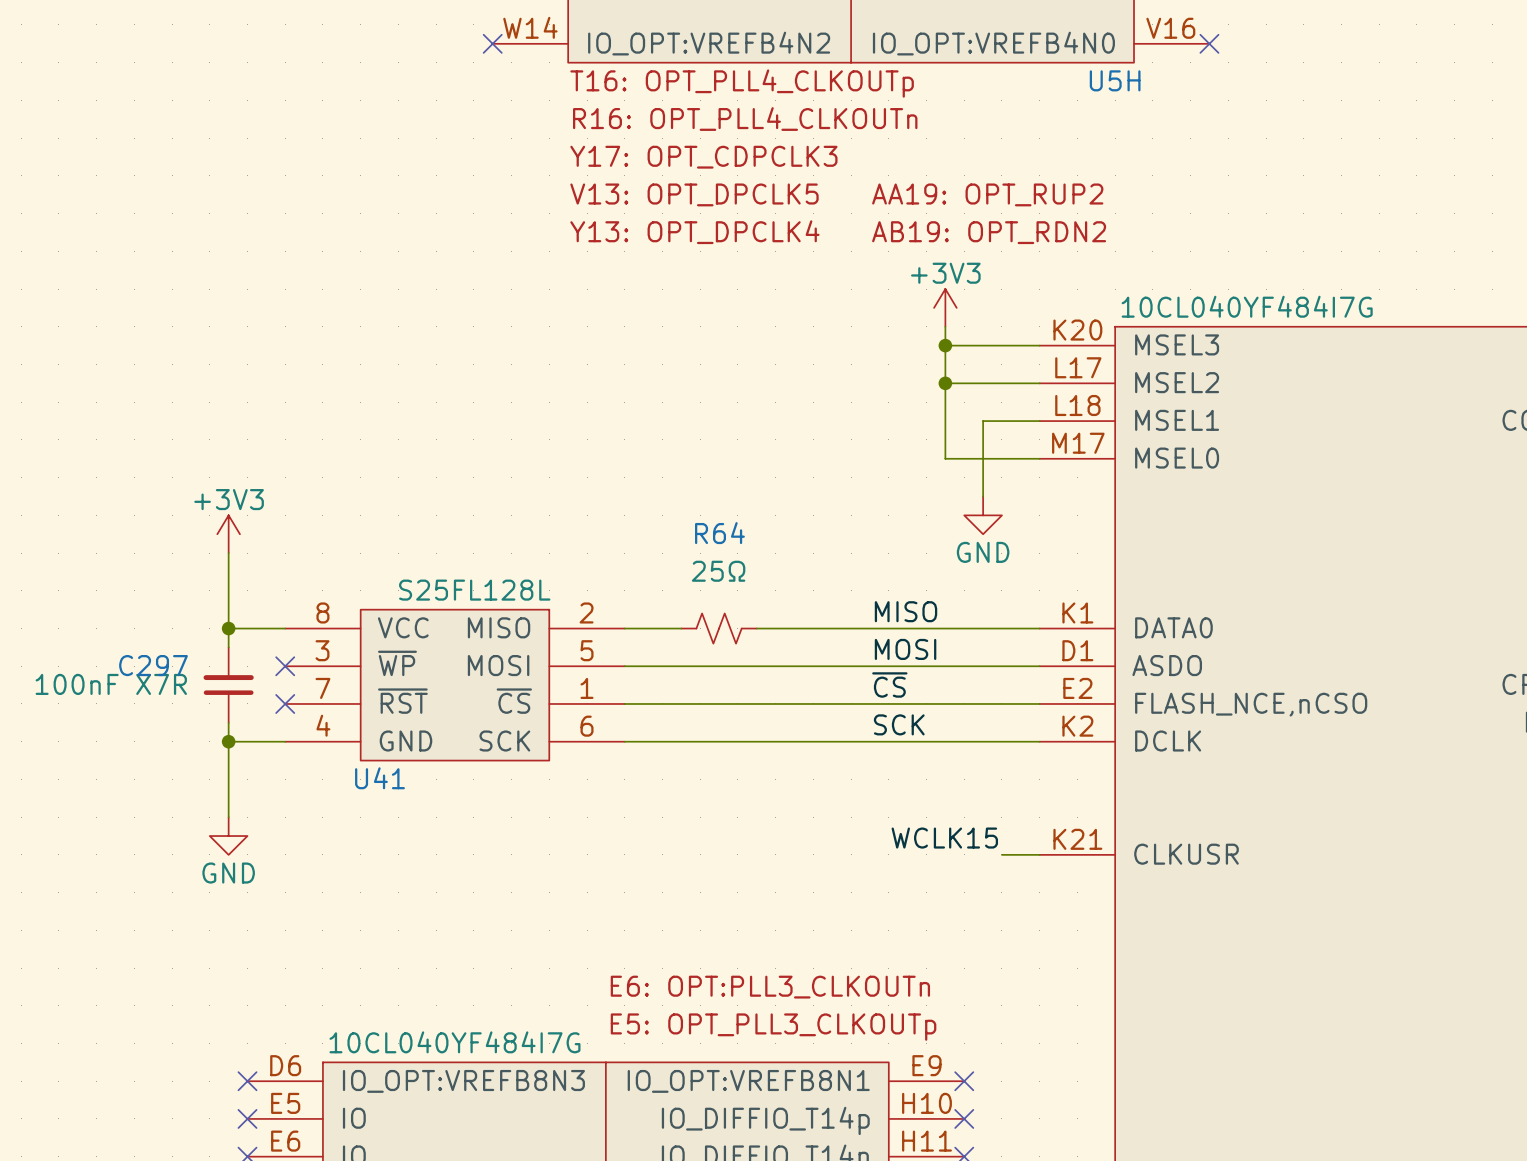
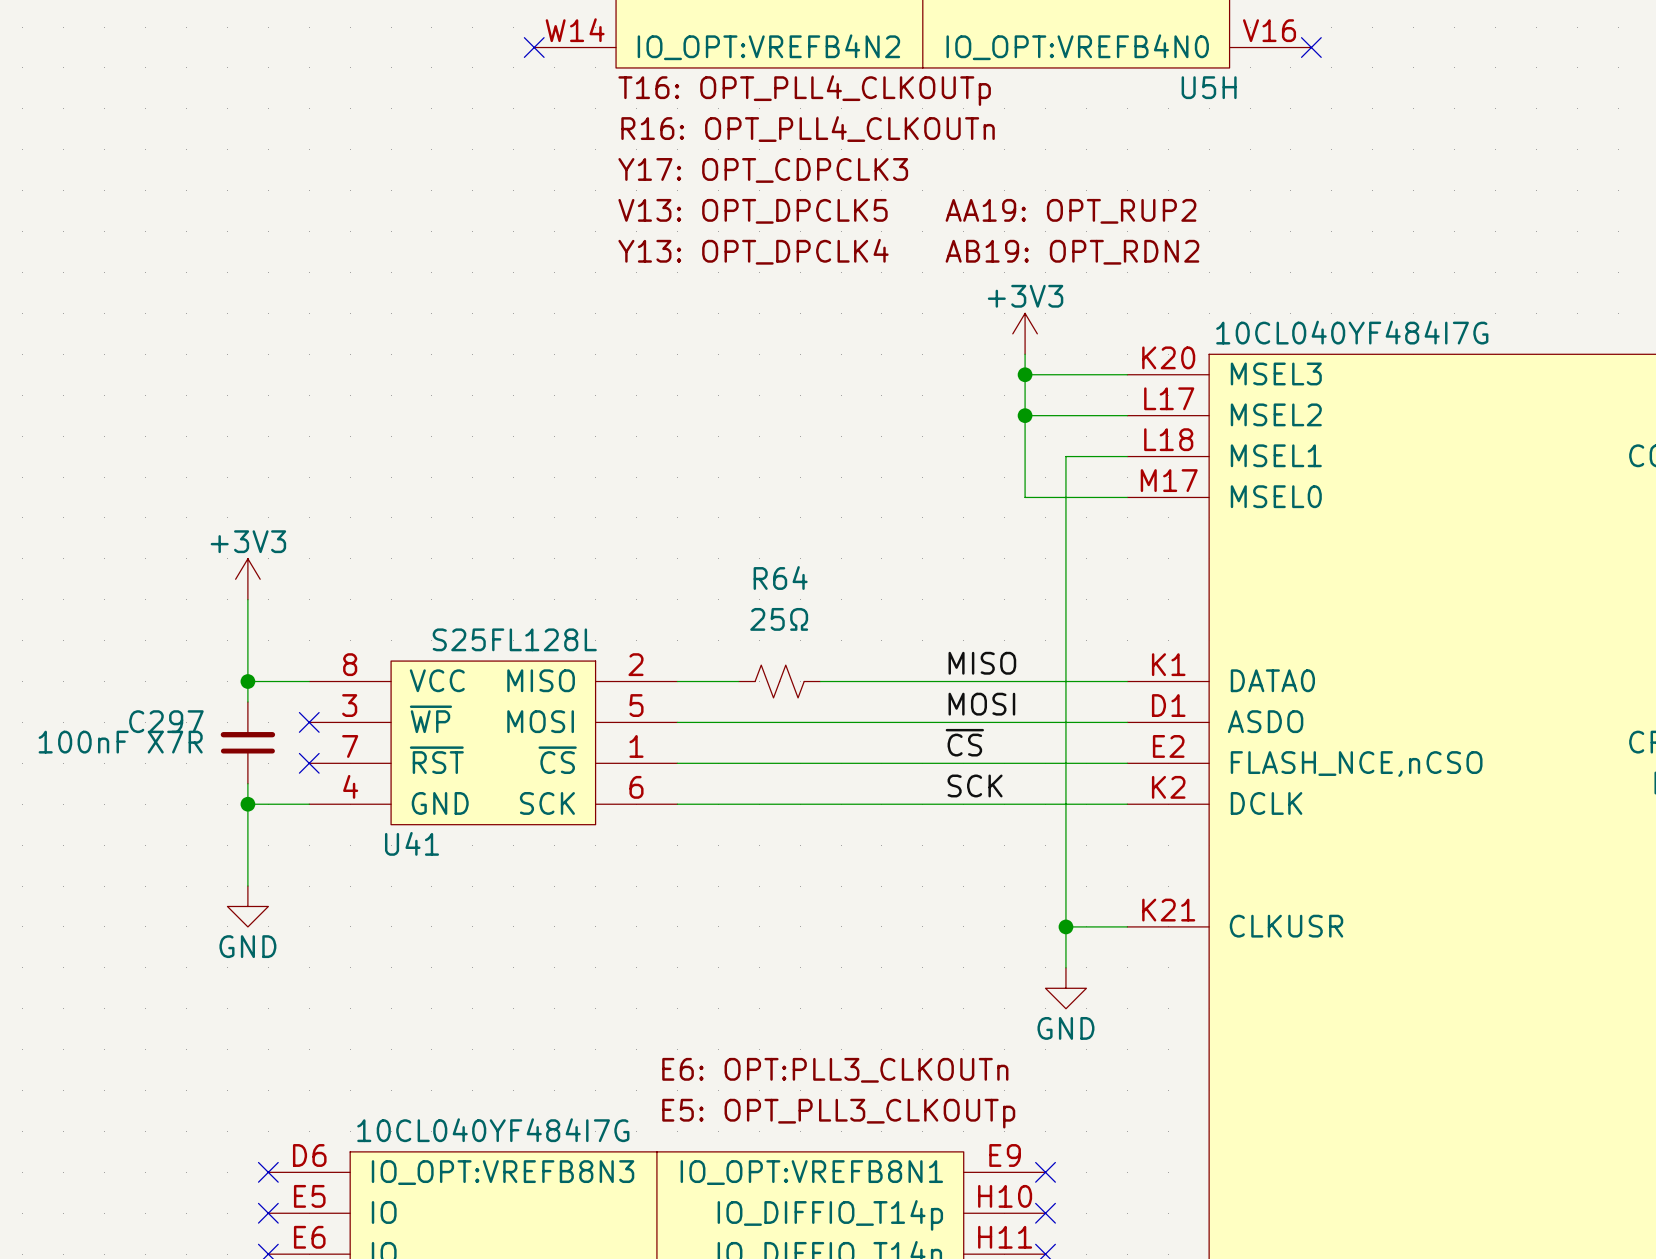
wire: none -> (1065, 538) (1065, 967)
power symbol: GND (983, 515) -> none
label: WCLK15 (944, 838) -> none
wire: none -> (1065, 926) (1086, 926)
junction: none -> (1065, 926)
power symbol: none -> GND (1065, 988)

